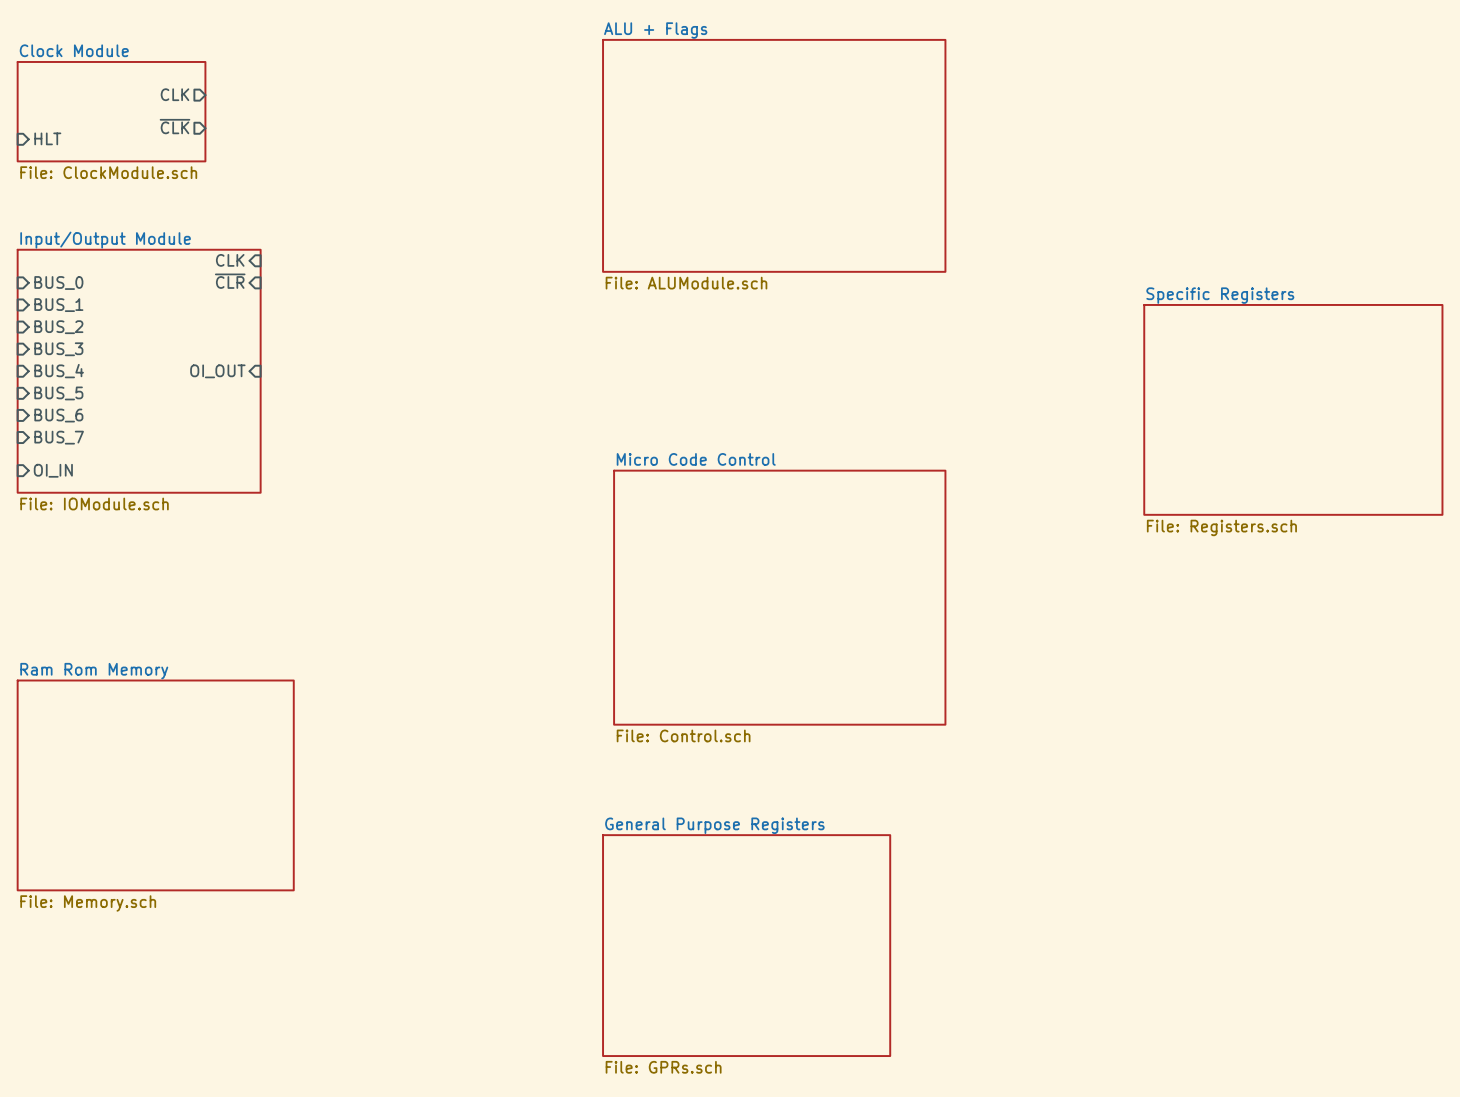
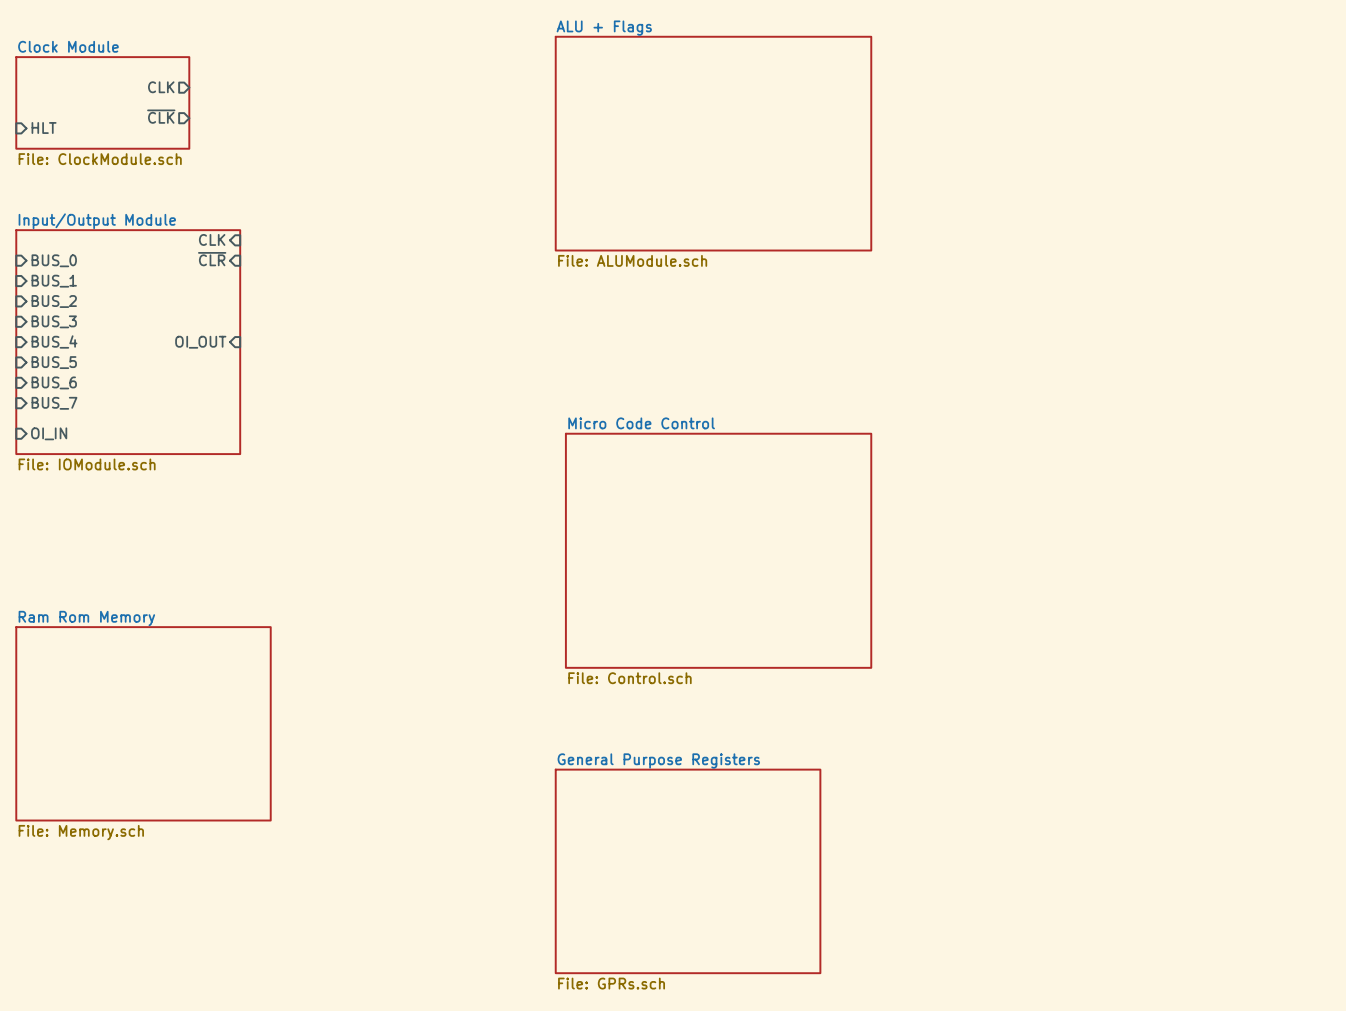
sheet Specific Registers: File: Registers.sch (1293, 409) -> none

